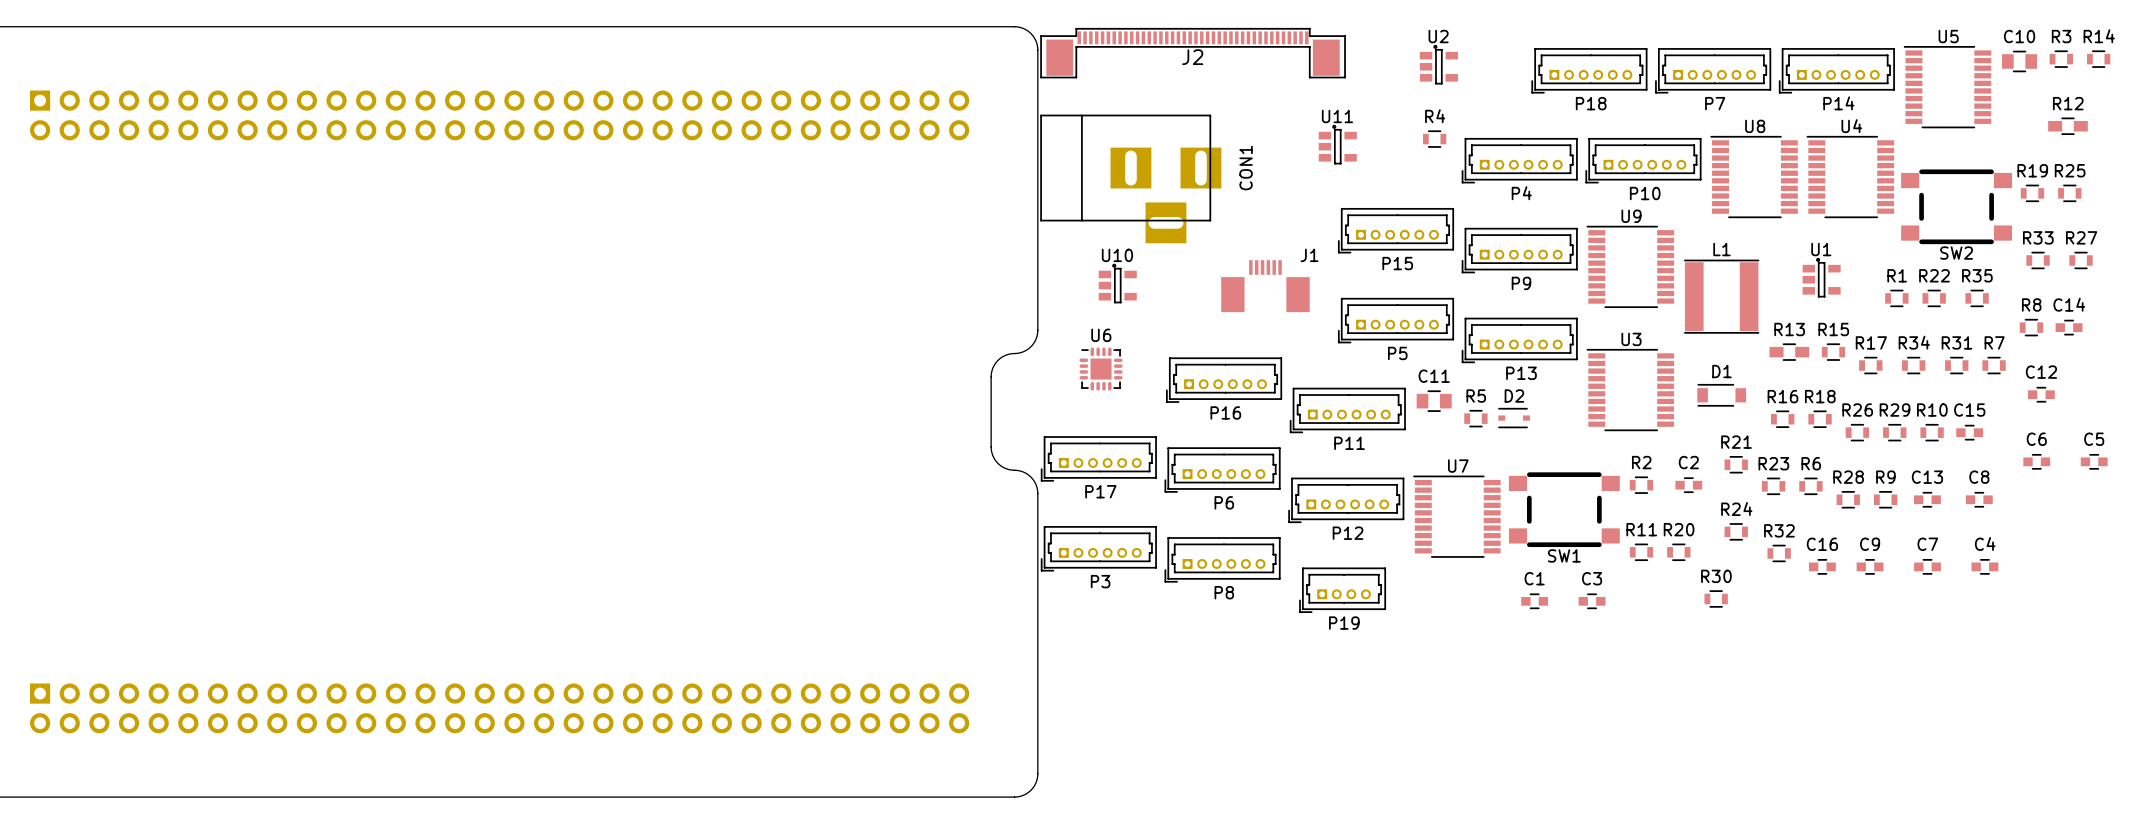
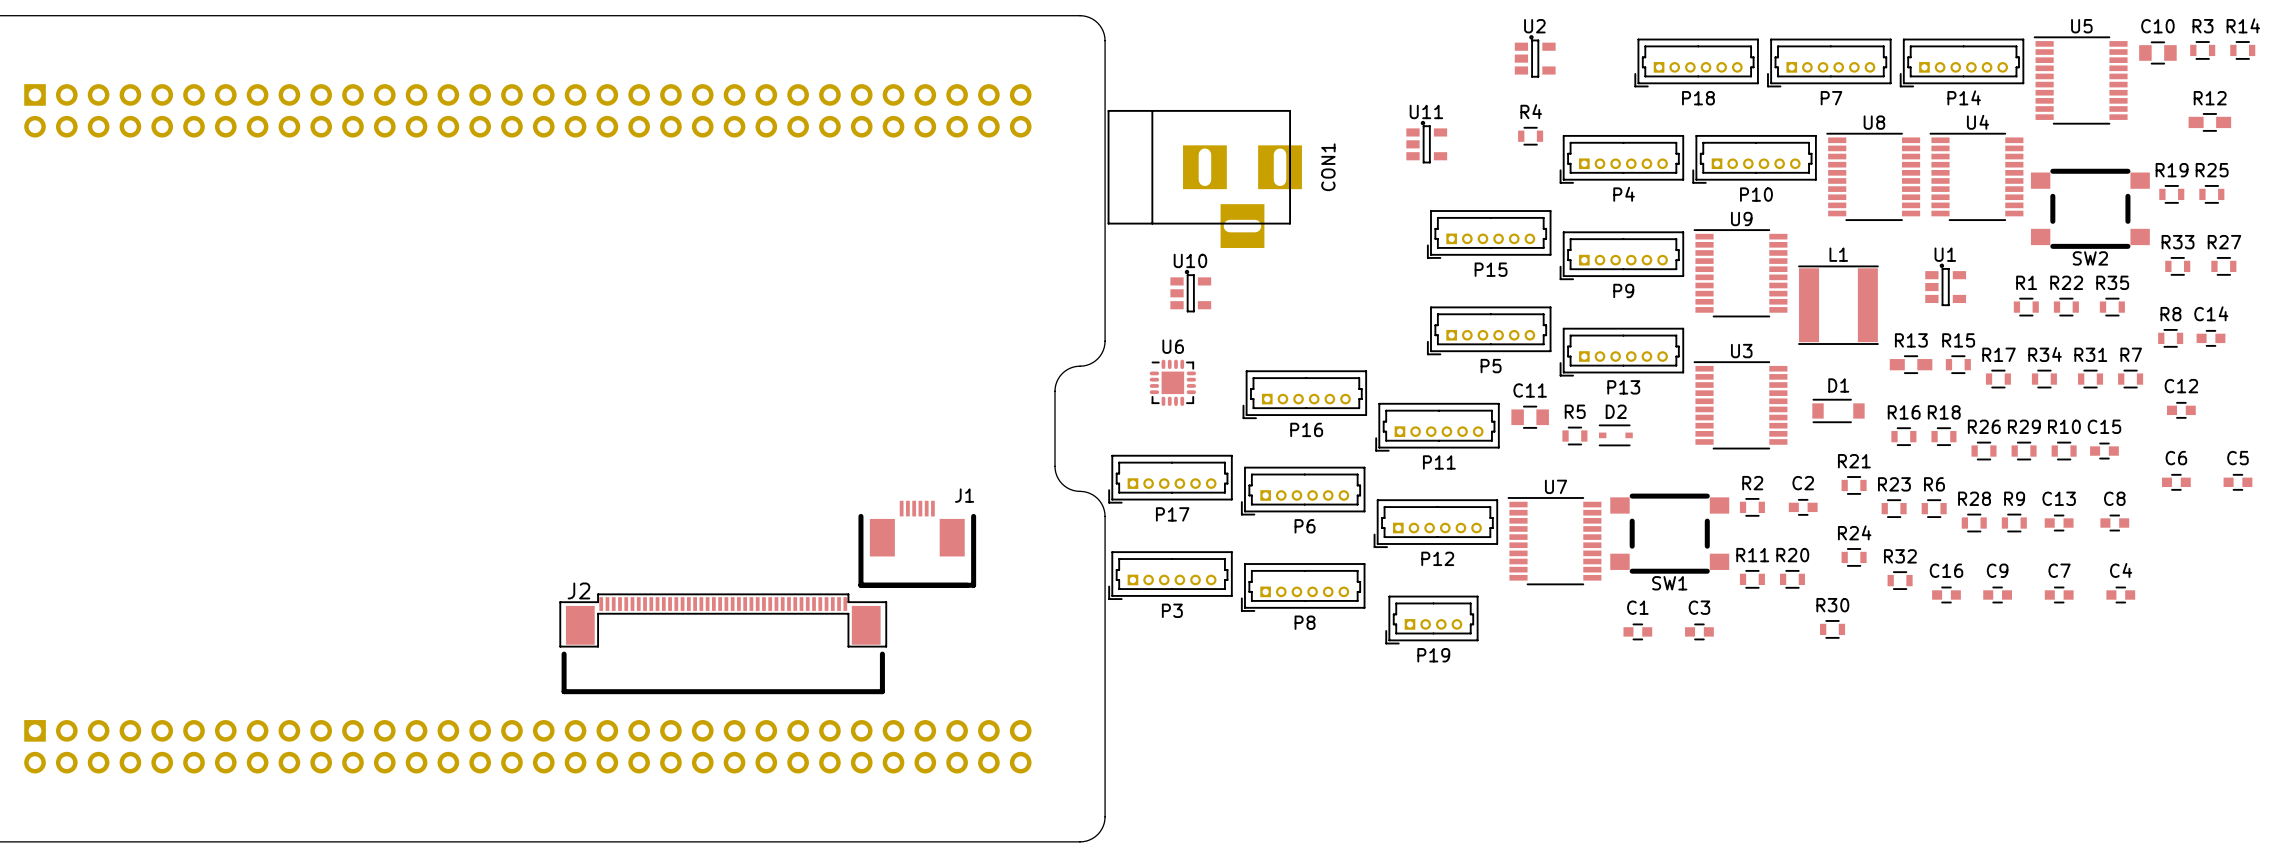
J2 footprint: [1040, 27, 1346, 79] -> [559, 593, 888, 695]
J2 name position: J2 (1192, 57) -> J2 (578, 590)
J1 footprint: [1221, 260, 1310, 313] -> [858, 500, 977, 588]

